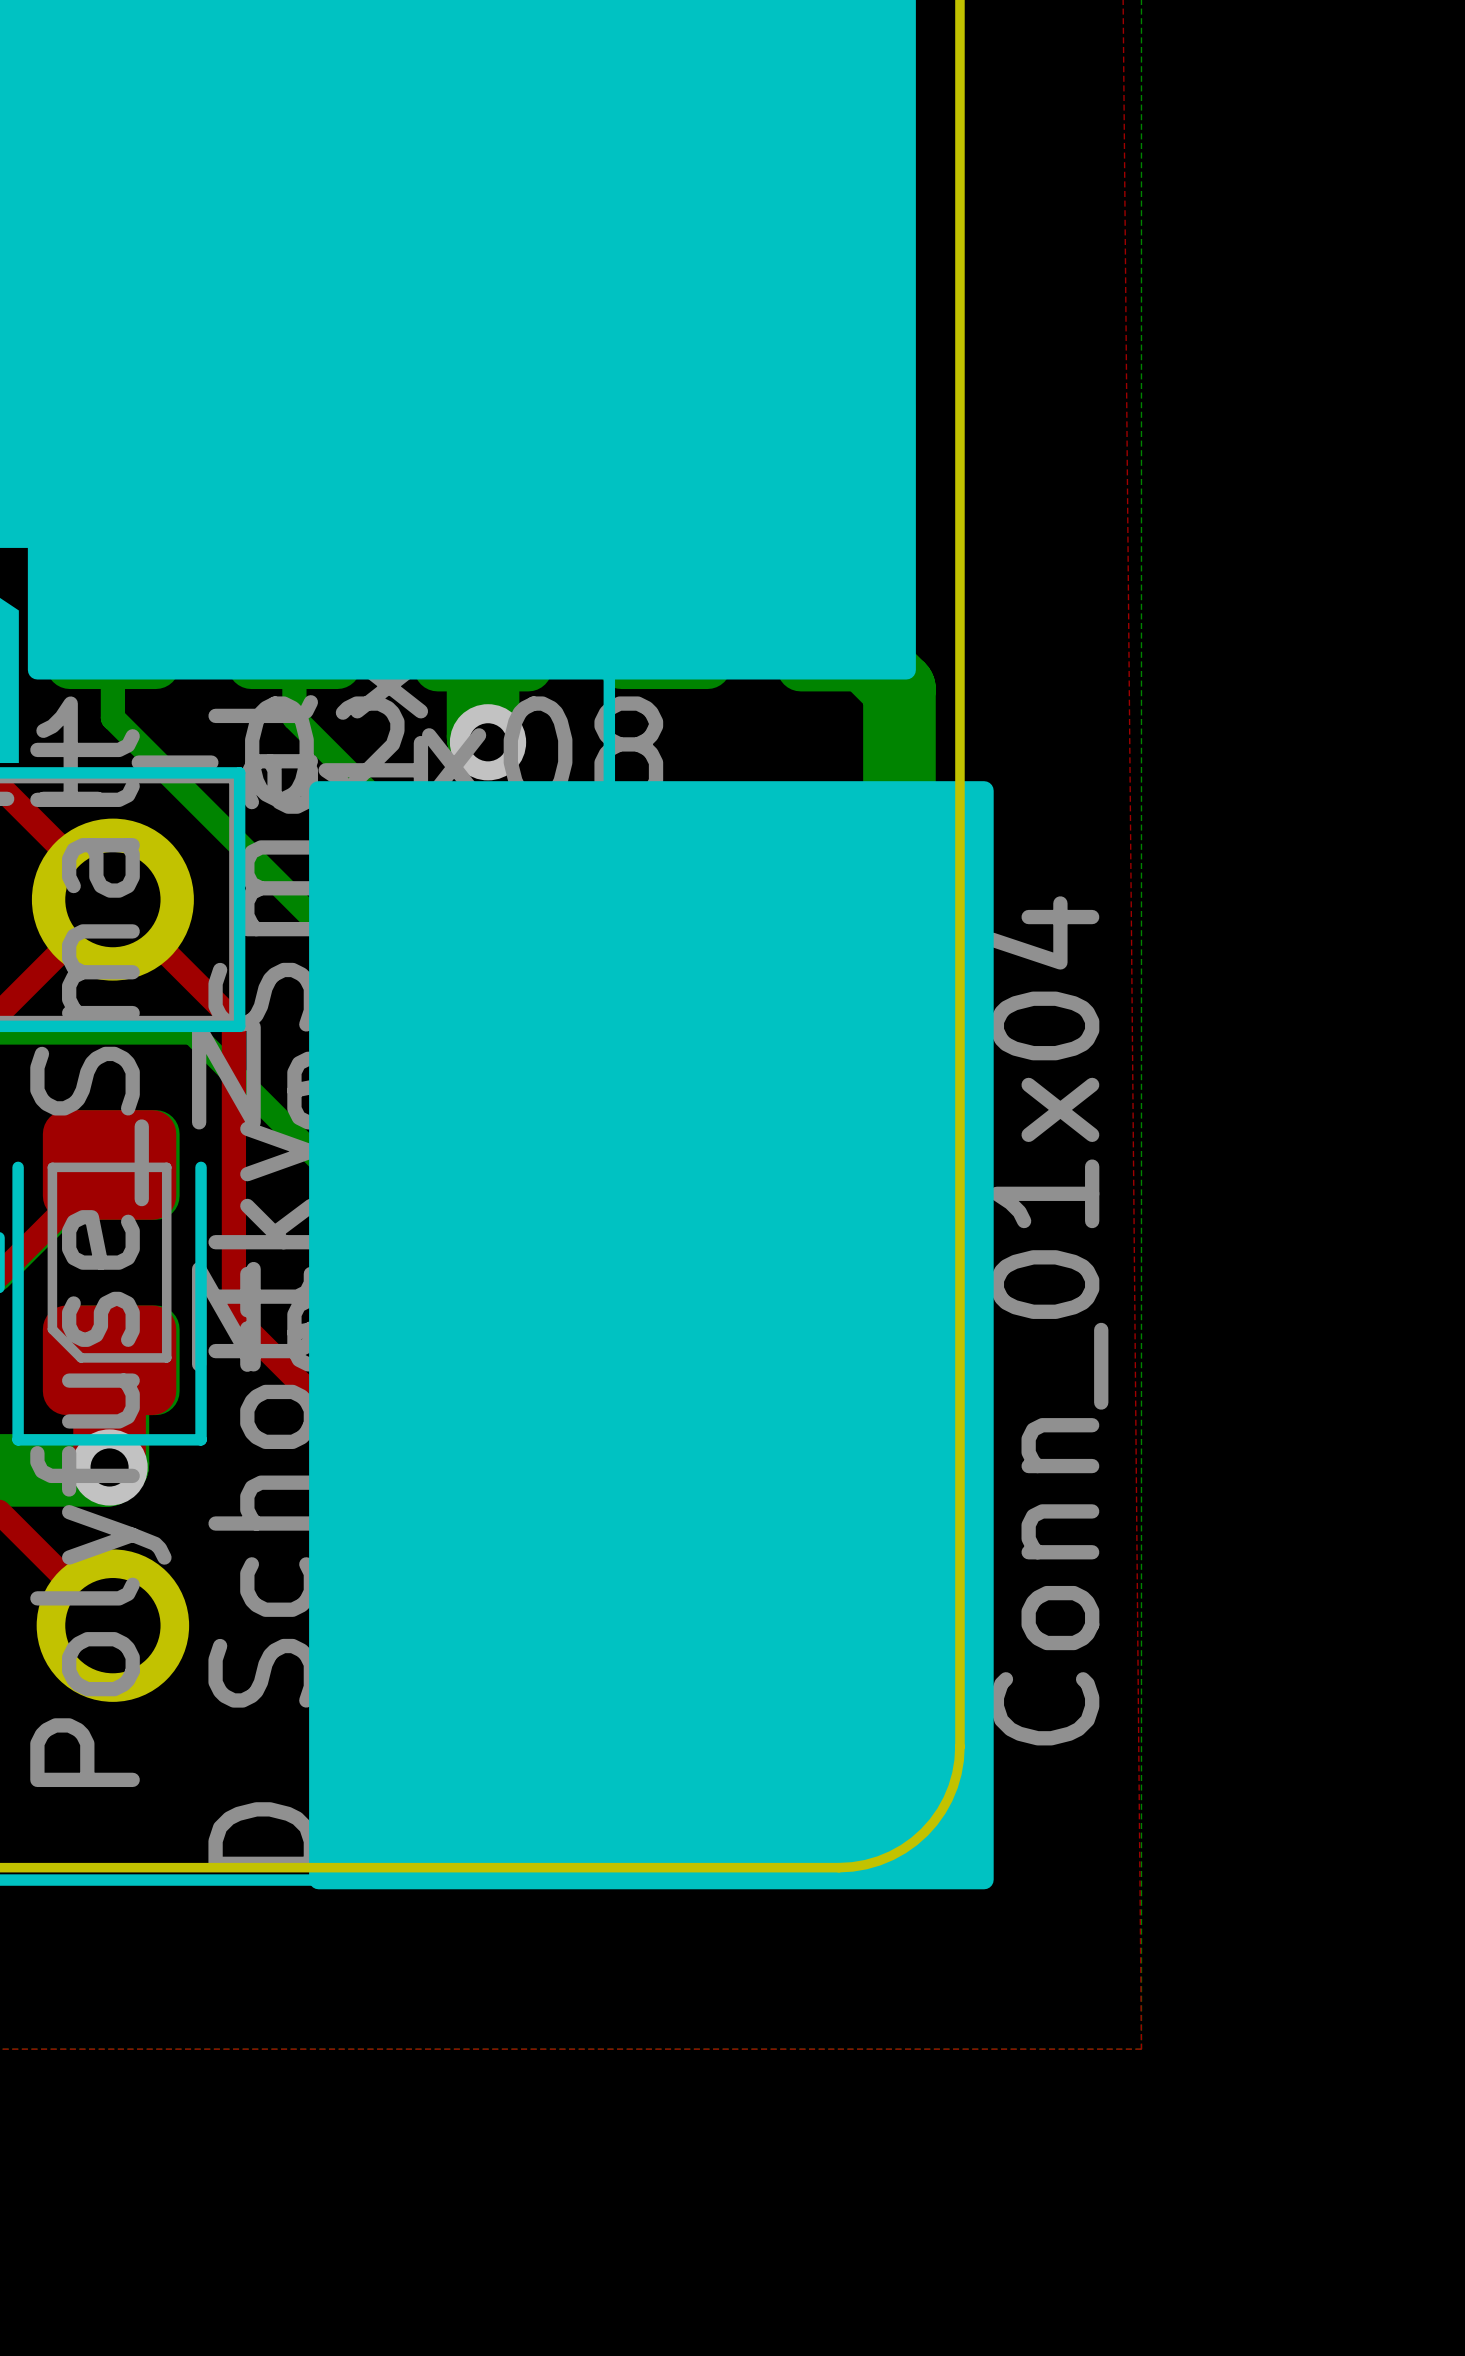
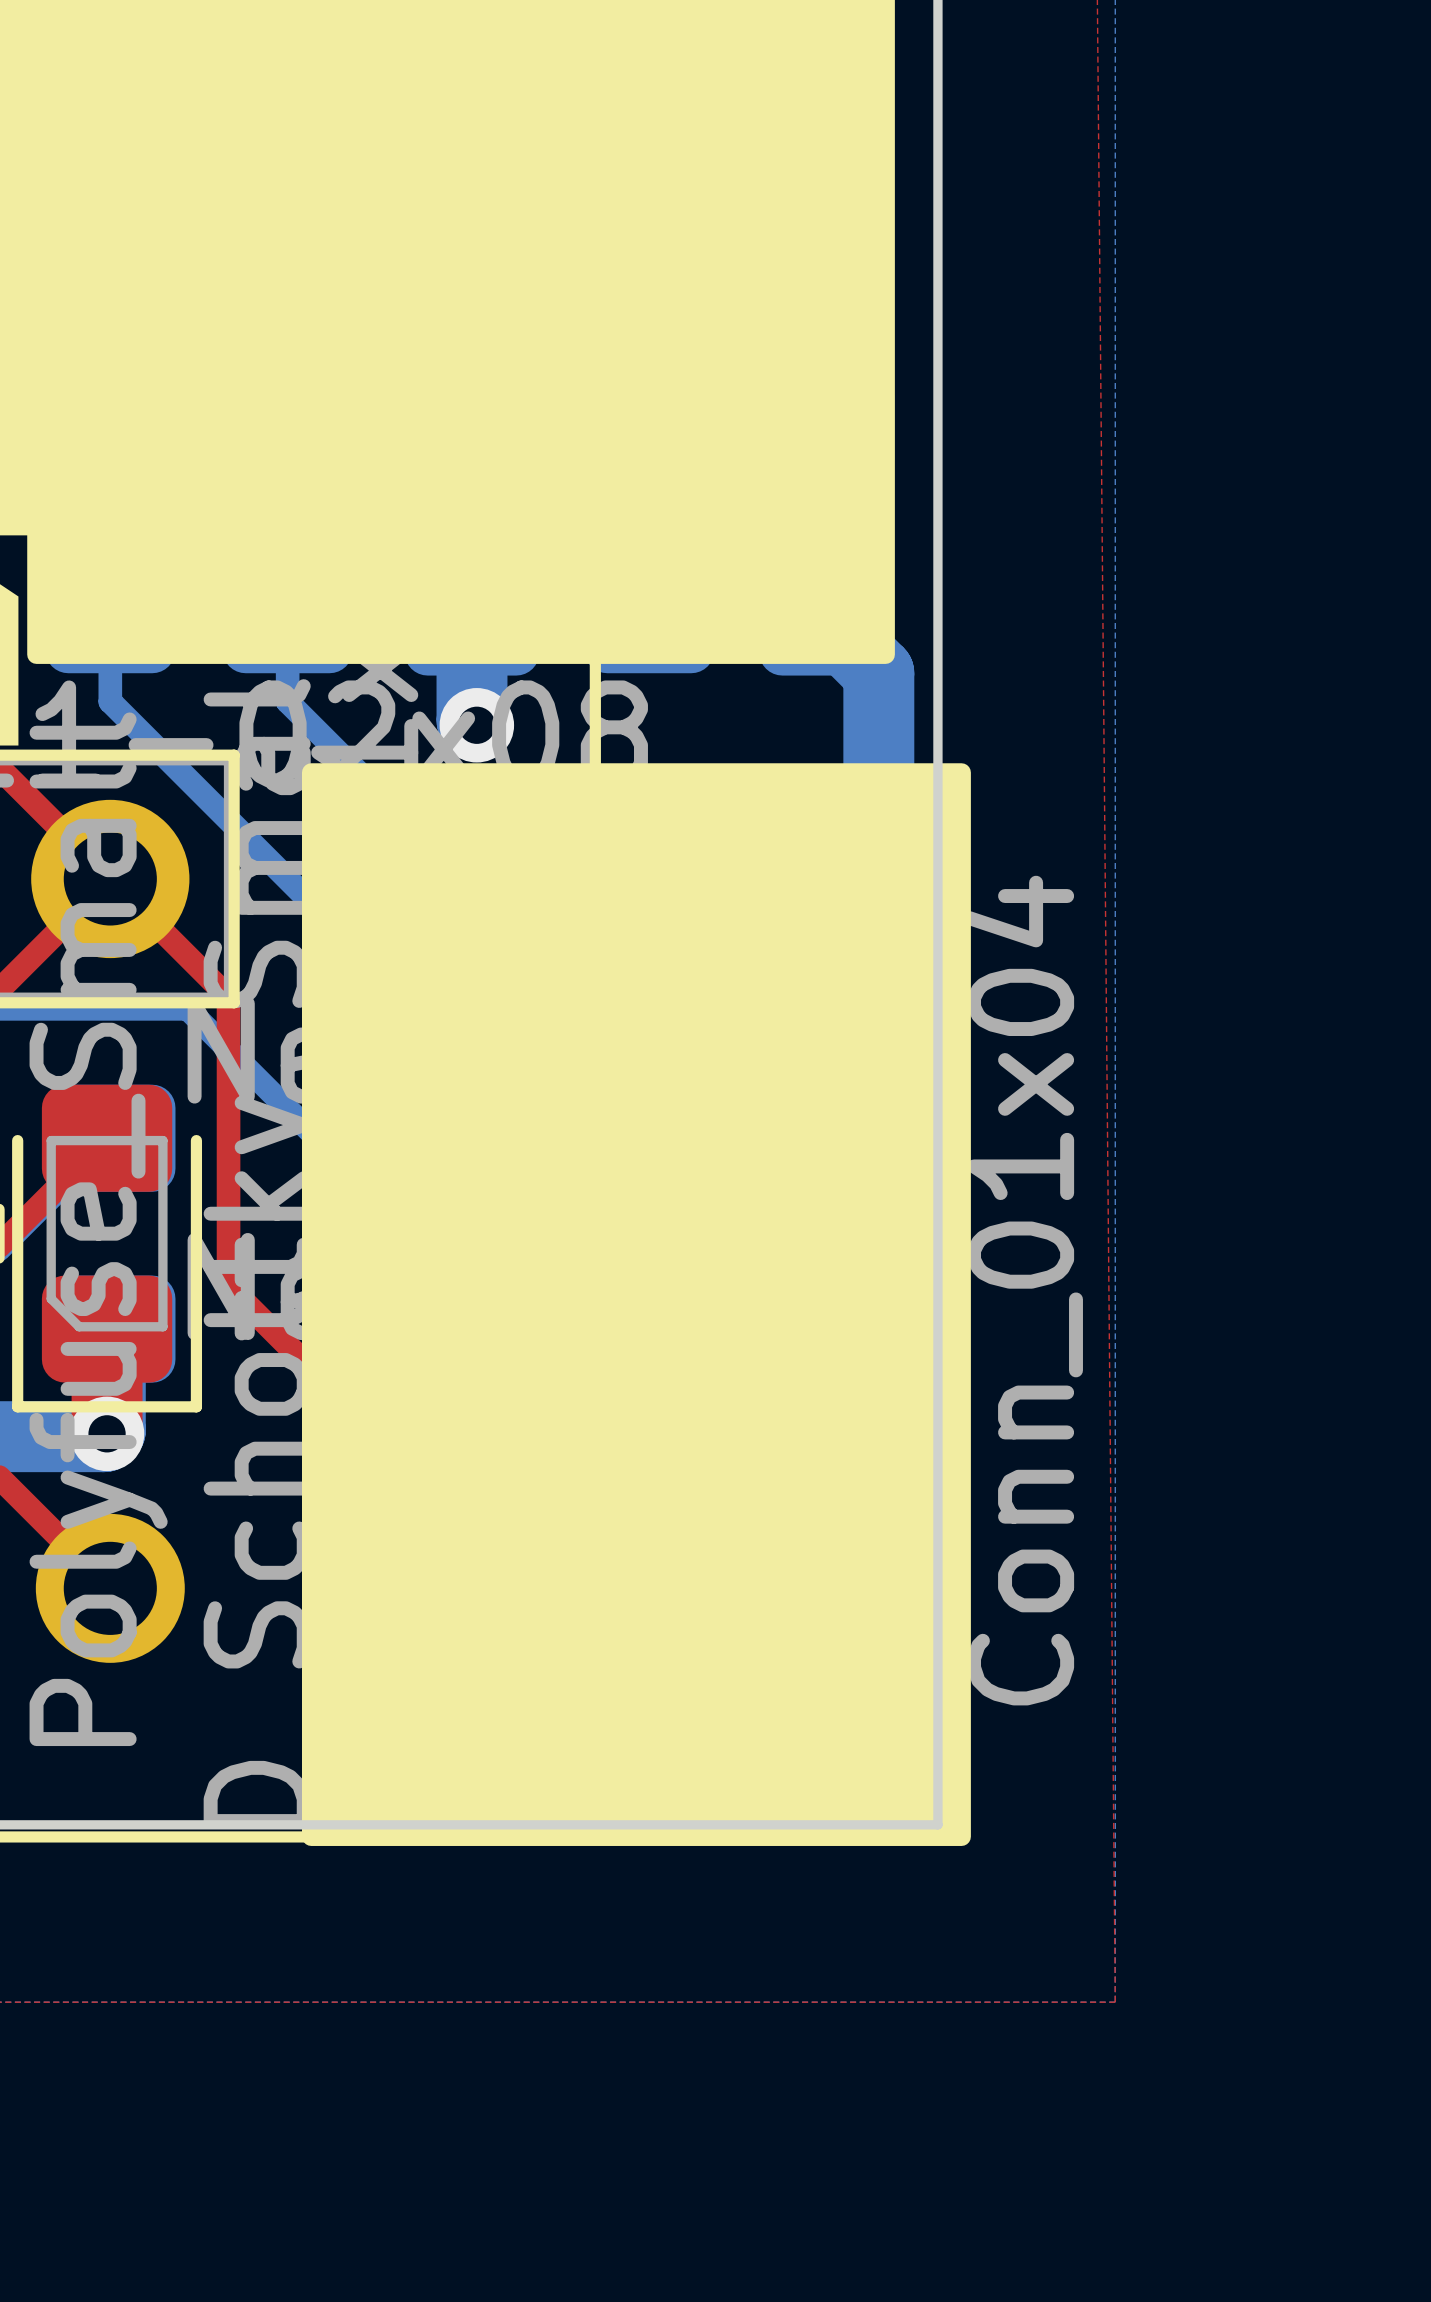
board edge: (959, 1746) (956, 1773) (947, 1799) (933, 1822) (924, 1832) (914, 1841) (891, 1855) (865, 1864) (838, 1867) -> (937, 1706) (937, 1824) (819, 1824)

